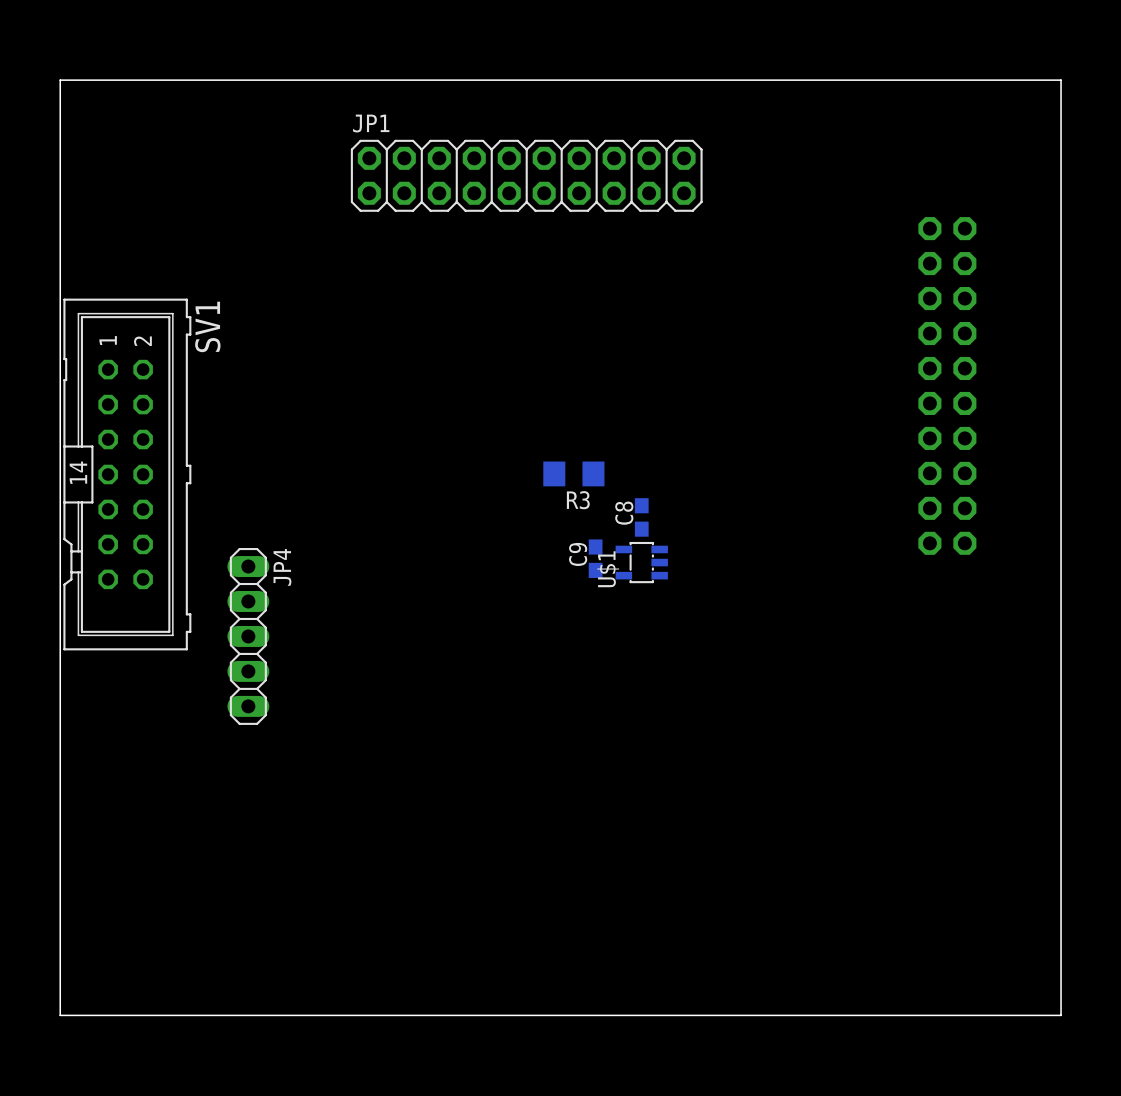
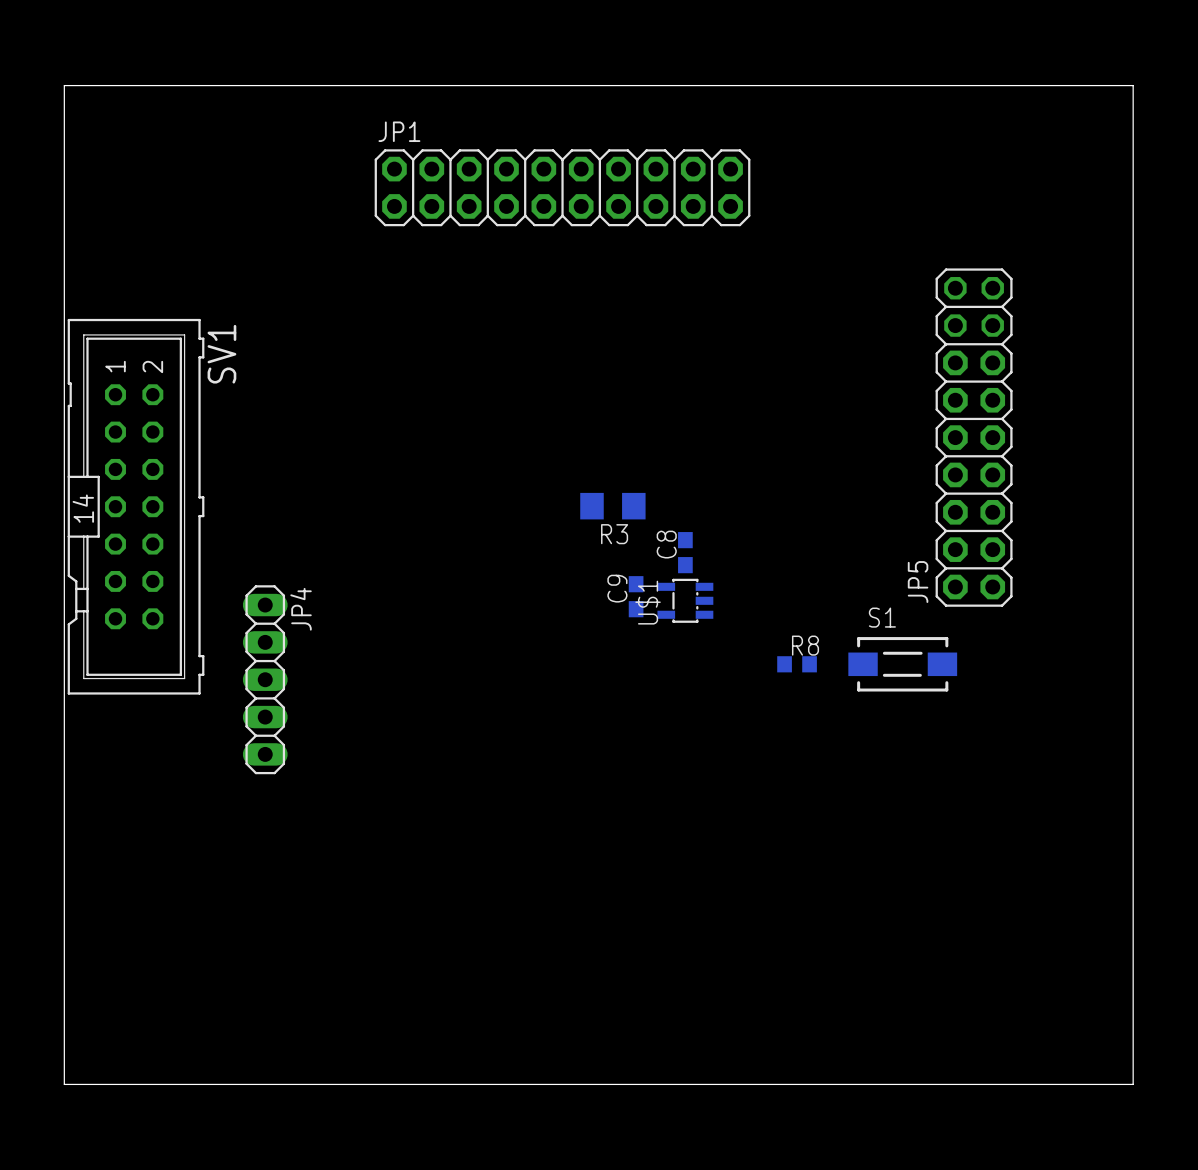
part: (947, 385) -> none
JP5: none -> (974, 437)
R8: none -> (797, 664)
S1: none -> (902, 664)

